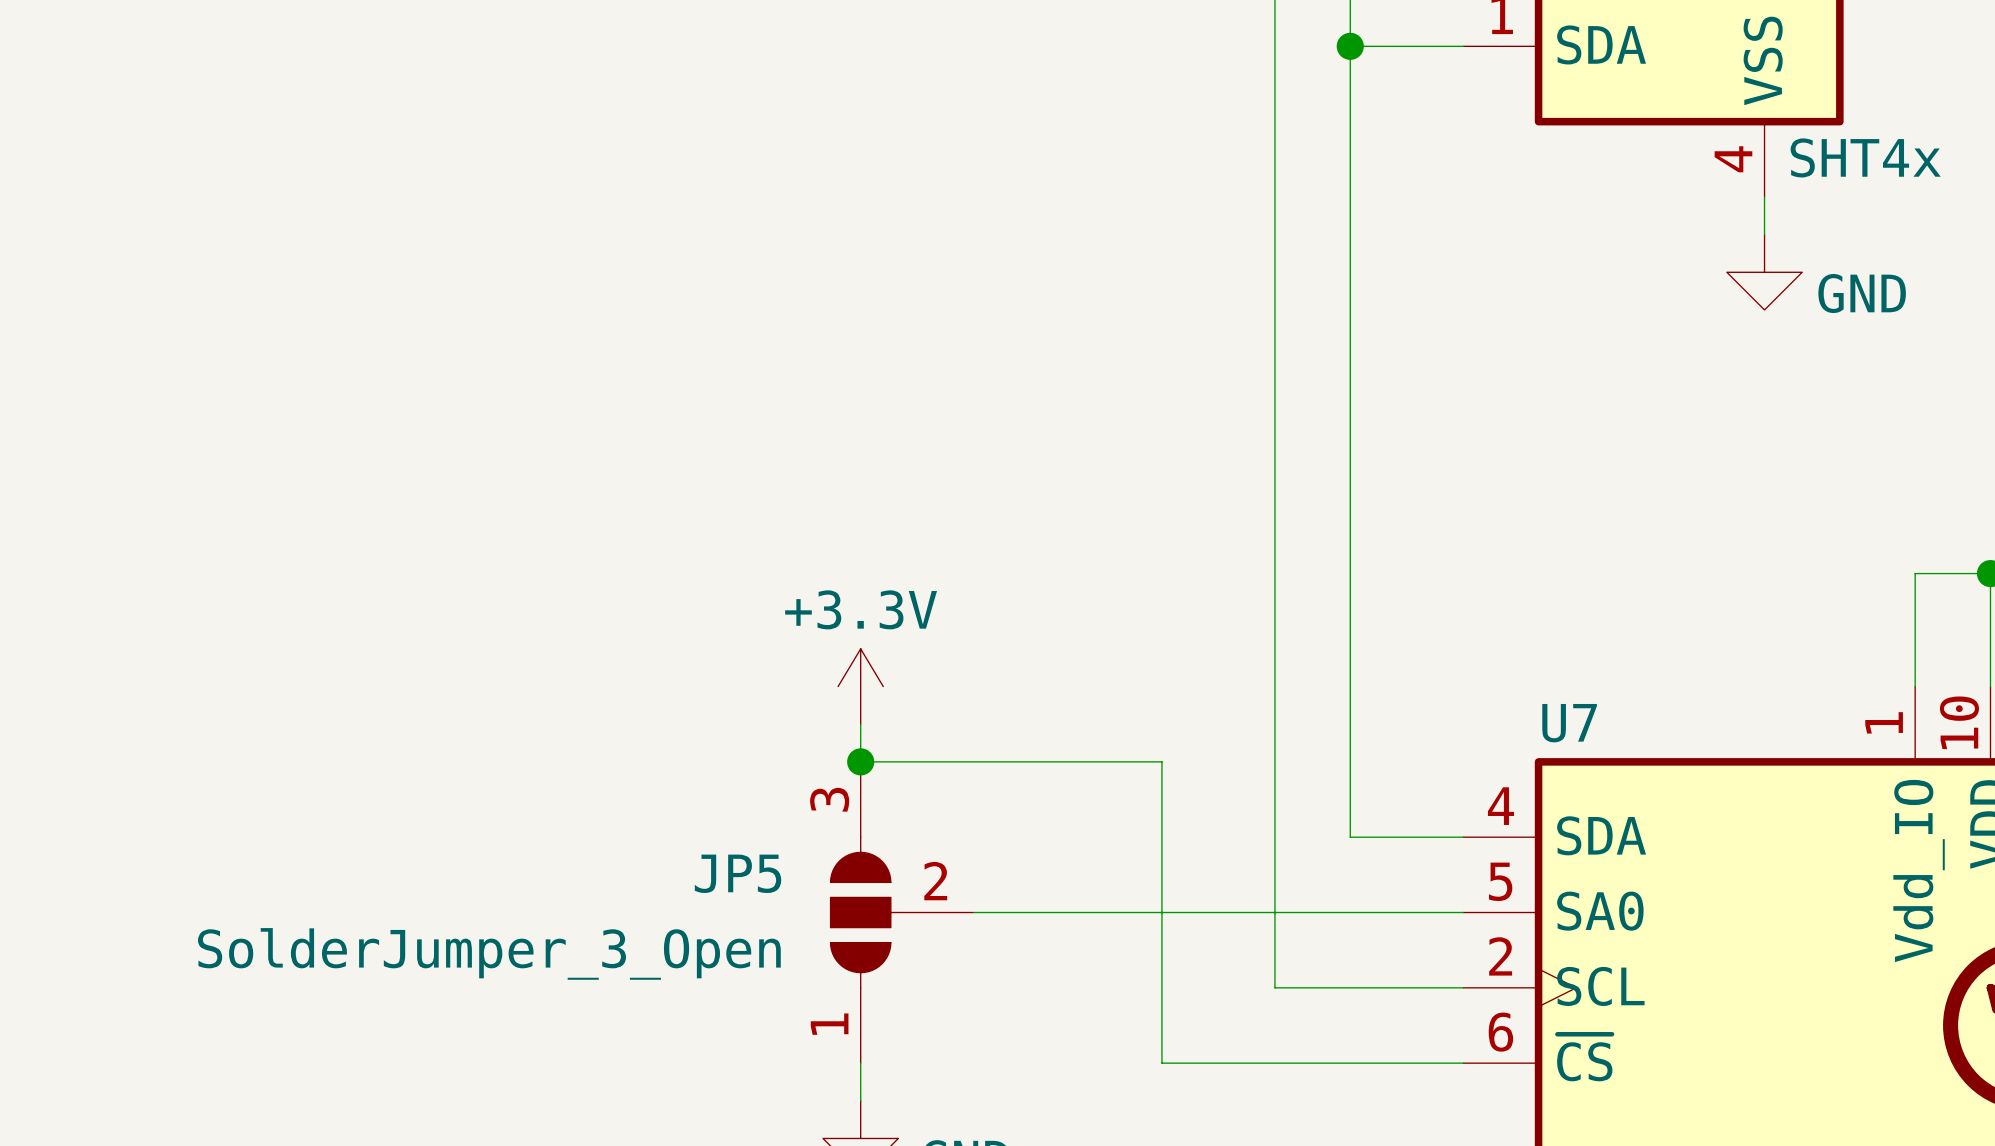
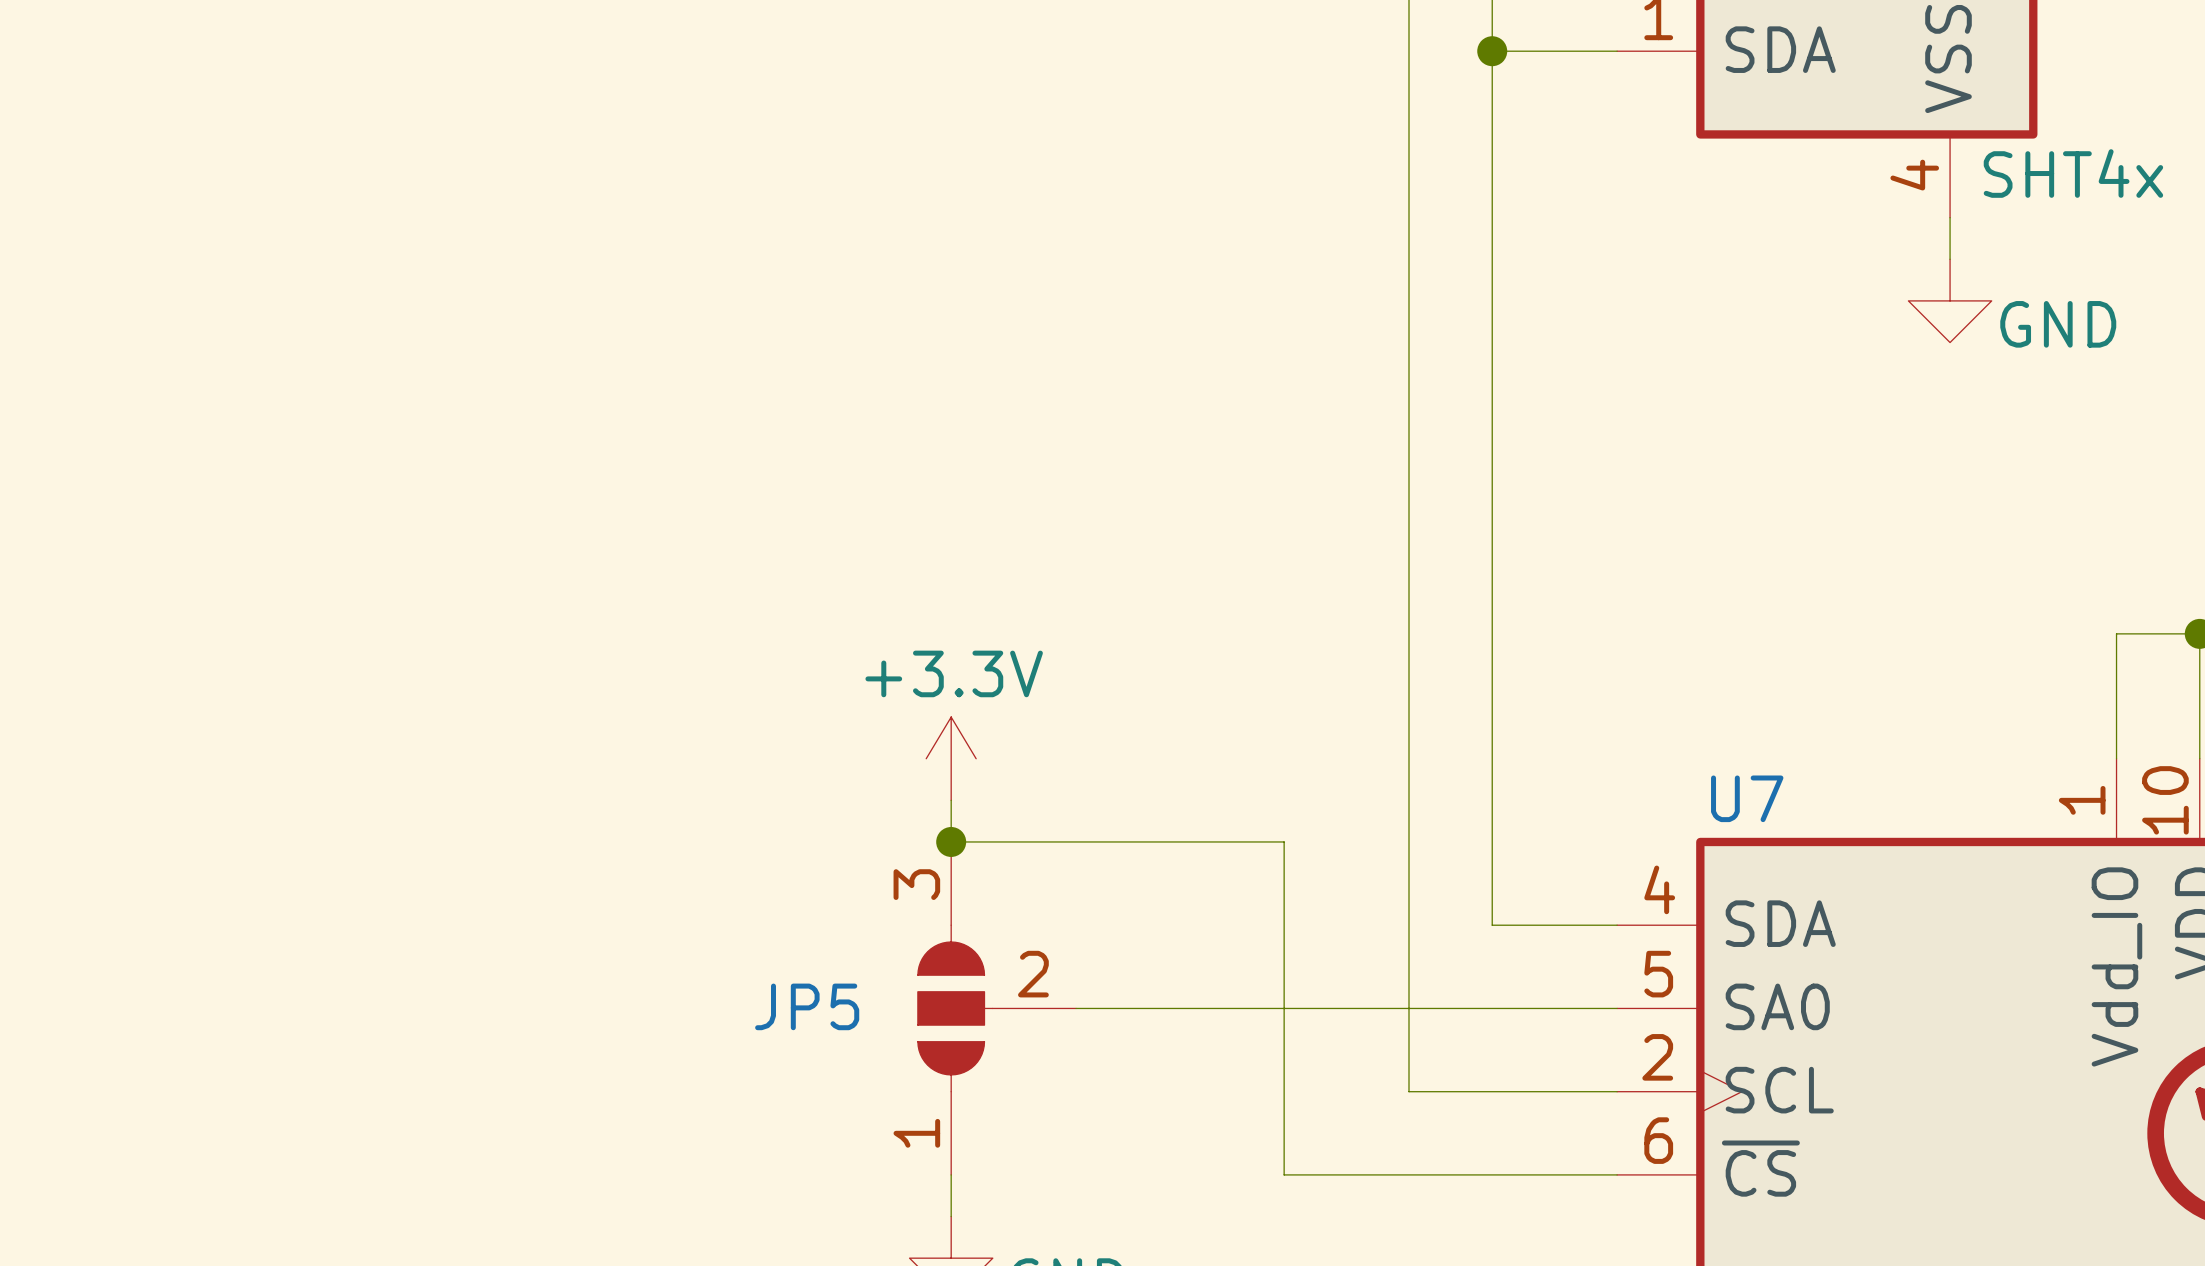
JP5 name position: JP5 (738, 873) -> JP5 (807, 1006)
JP5 value: SolderJumper_3_Open (489, 953) -> none

